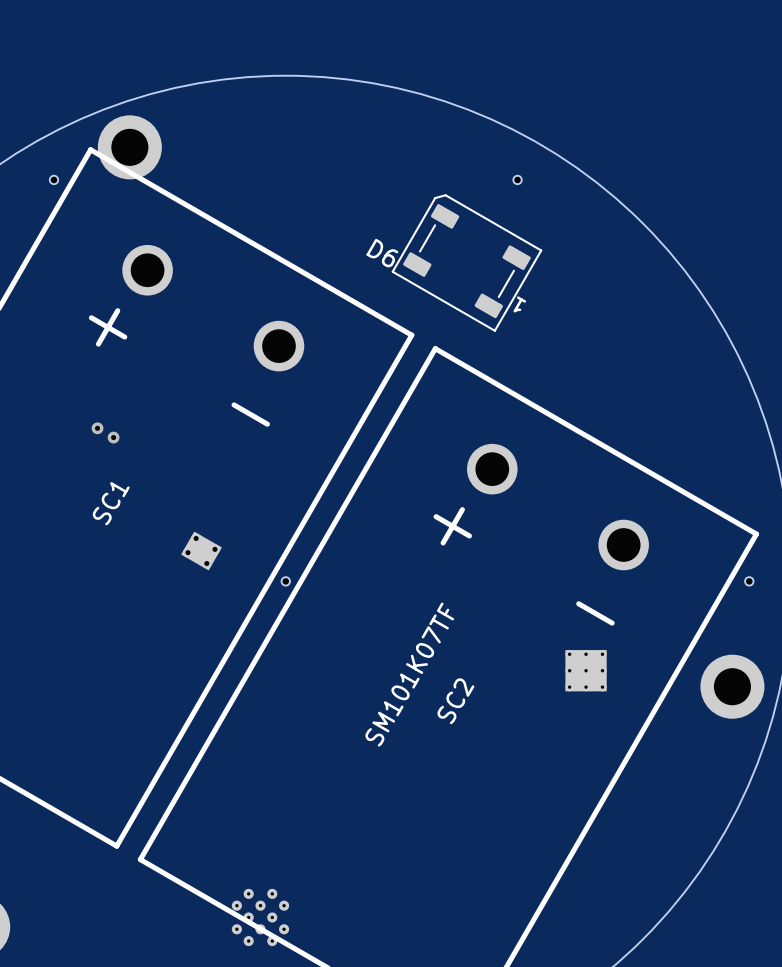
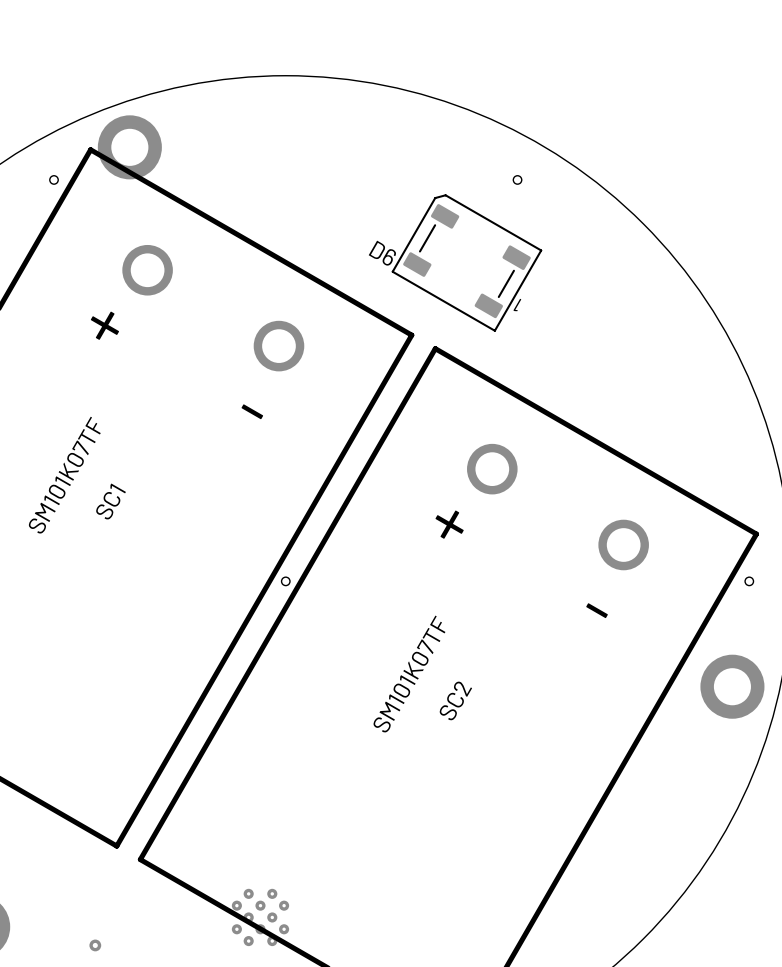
via: (97, 428) -> none
via: (113, 437) -> none
SC1 value: none -> SM101K07TF (64, 475)
part: (201, 551) -> none
part: (586, 670) -> none
via: none -> (95, 945)

